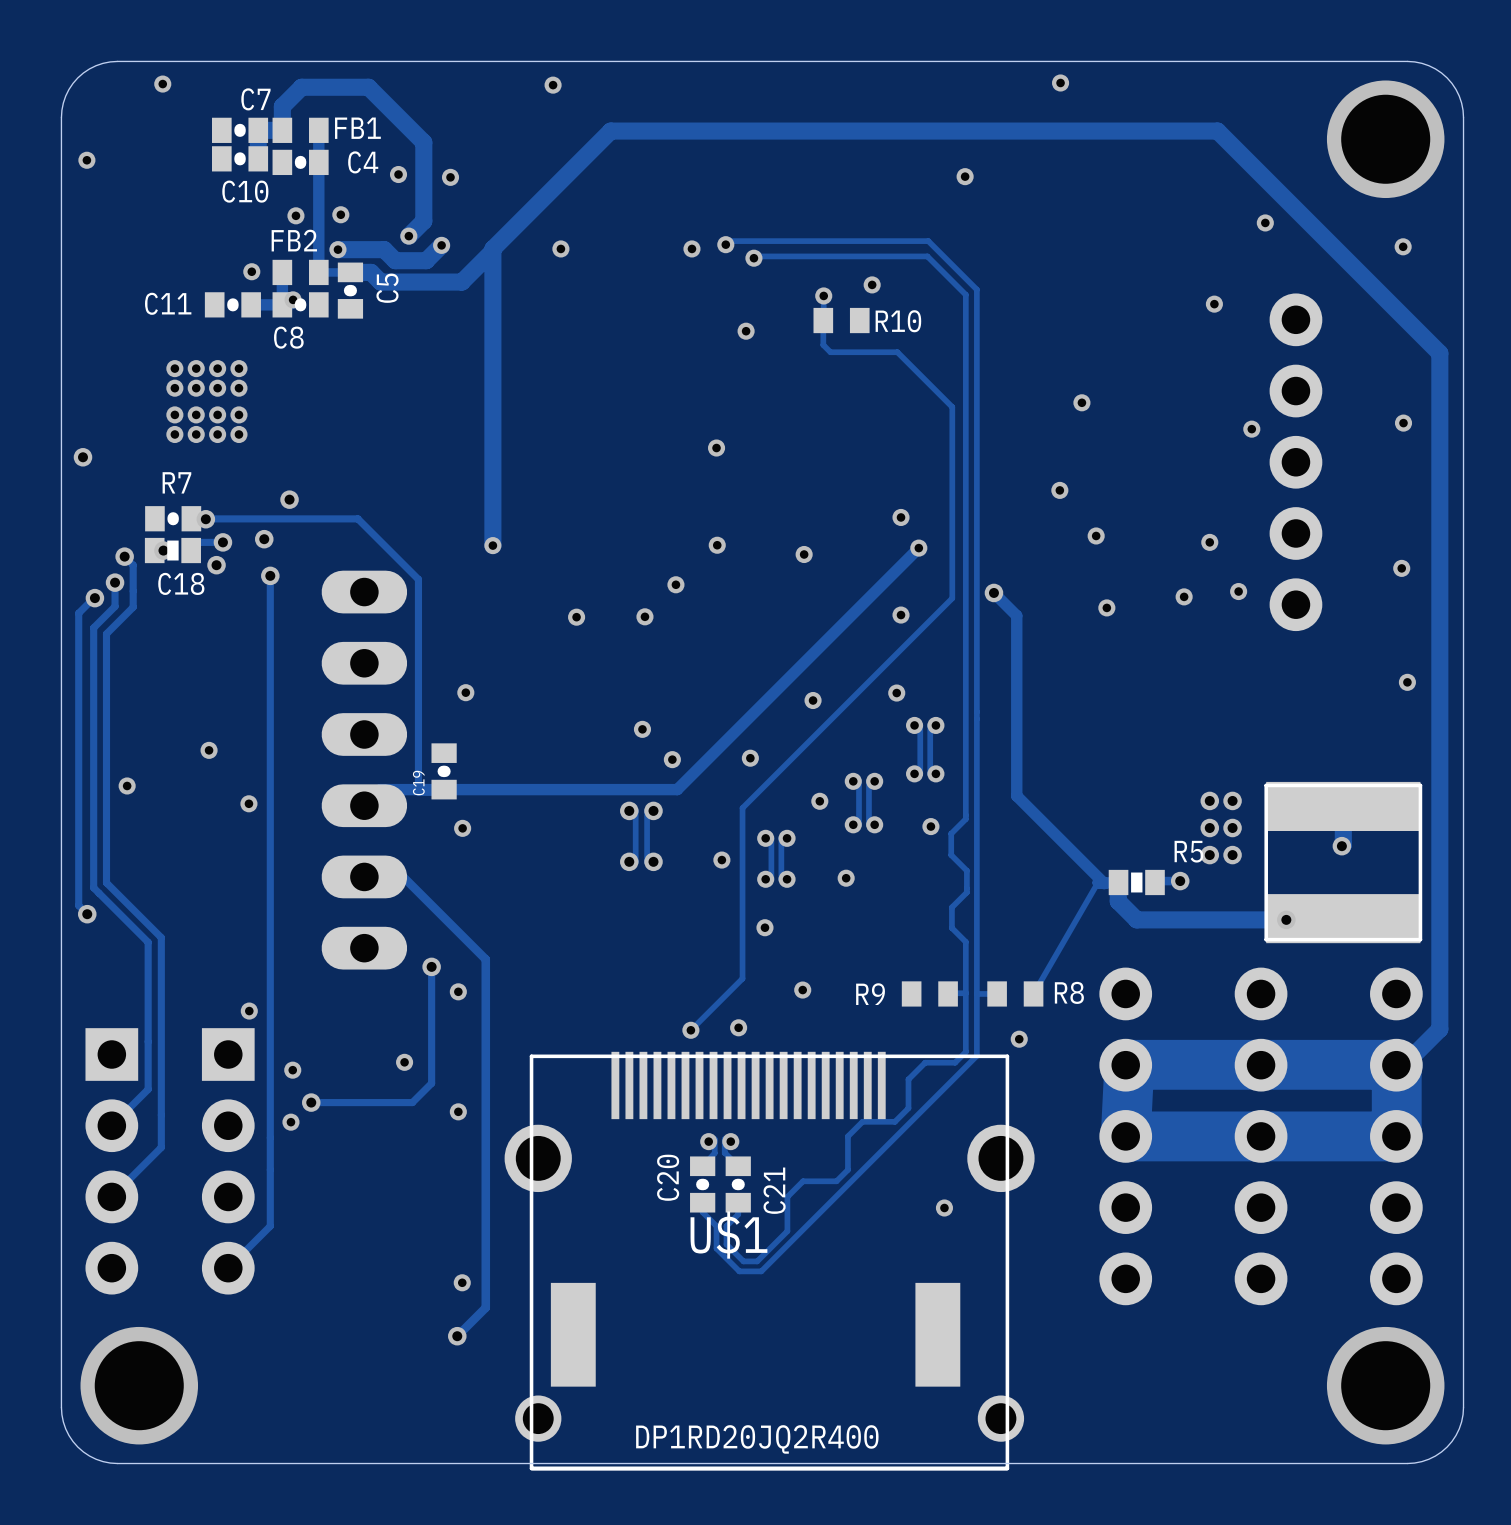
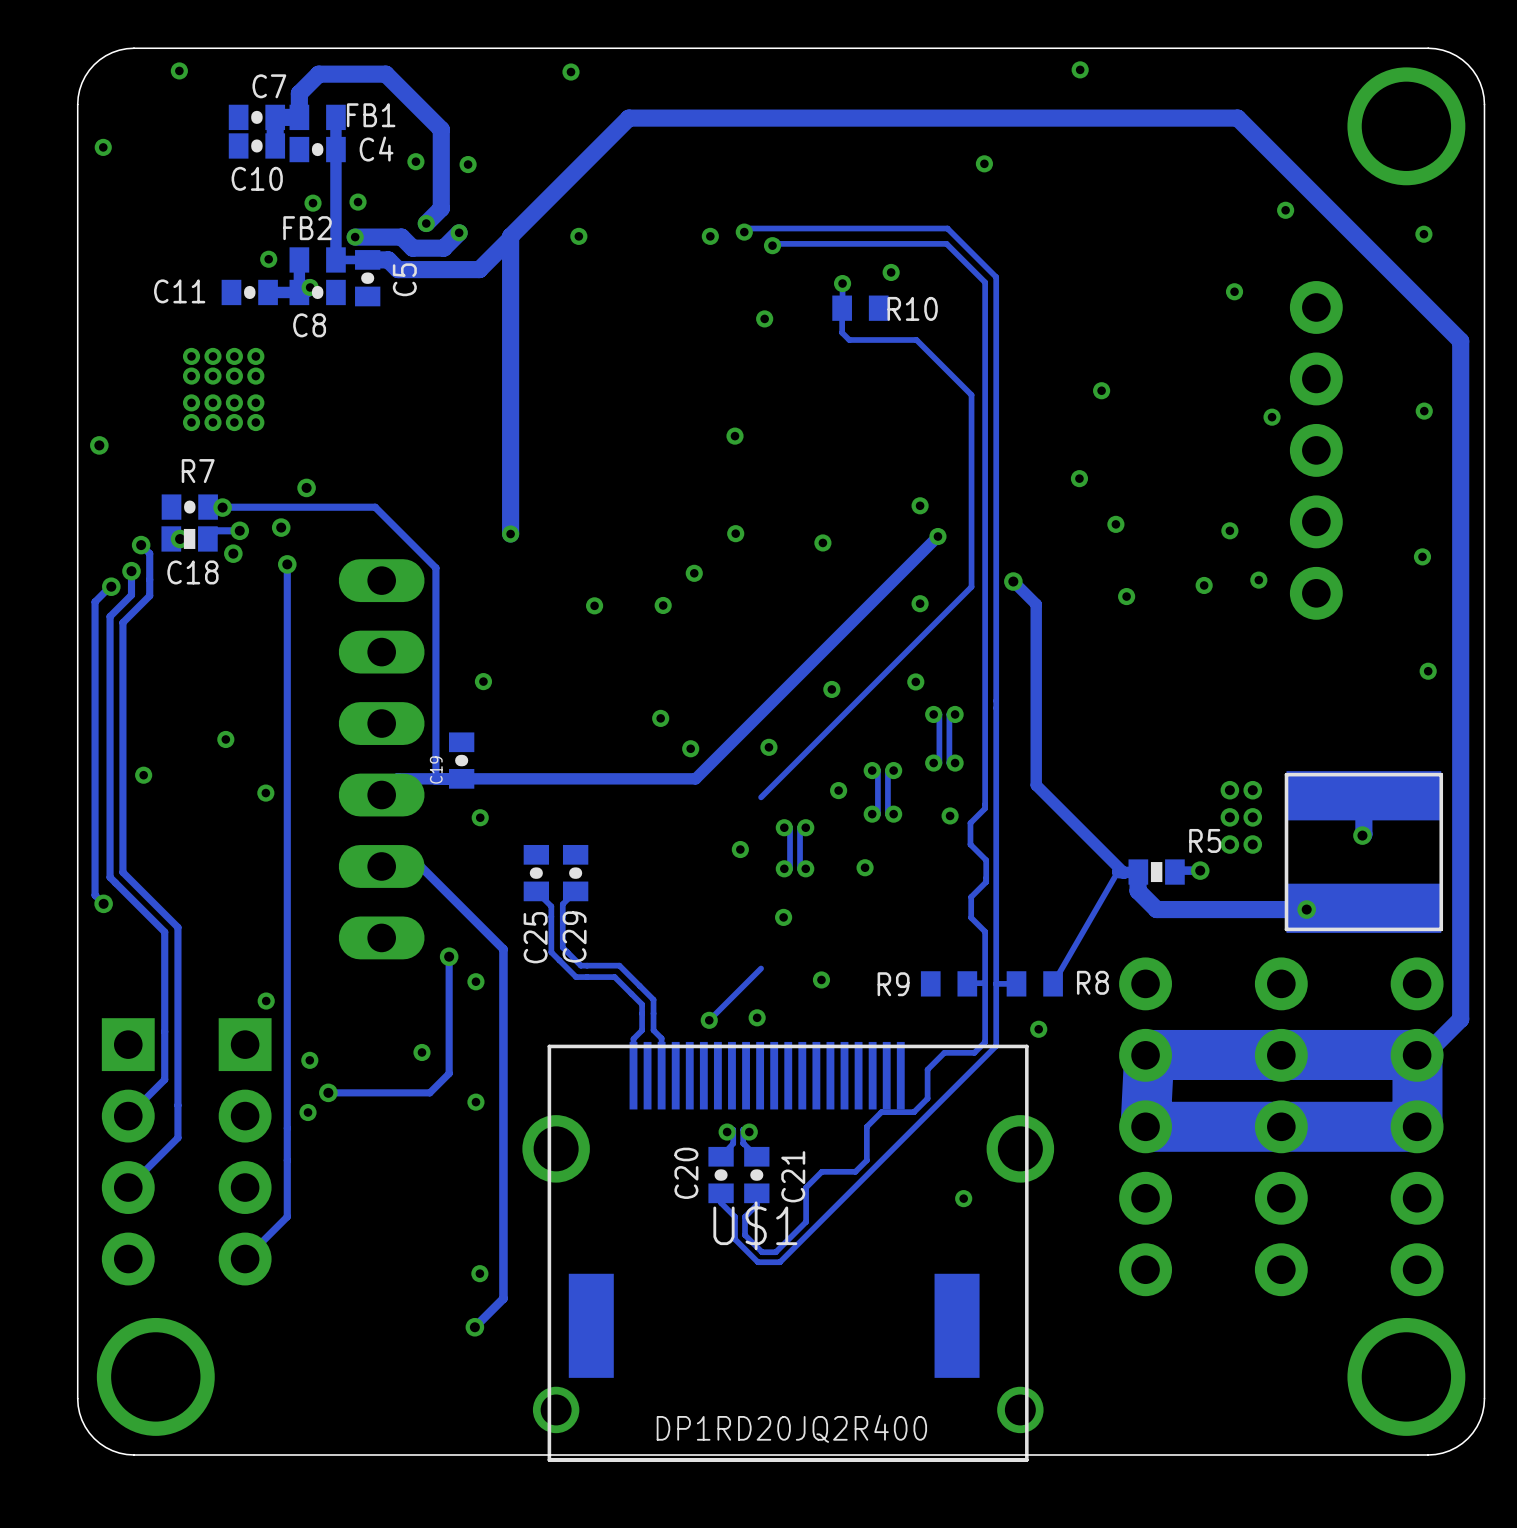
track: (742, 808) (742, 978) -> none
track: (629, 810) (635, 810) (635, 861) (629, 861) -> none
via: (629, 810) -> none
track: (653, 810) (647, 810) (647, 861) (653, 861) -> none
via: (653, 810) -> none
via: (629, 861) -> none
via: (653, 861) -> none
C25: none -> (536, 873)
C29: none -> (575, 873)
track: none -> (536, 891) (551, 906) (551, 952) (576, 977) (614, 977) (642, 1004) (642, 1030) (633, 1038) (633, 1075)
track: none -> (575, 891) (562, 904) (562, 947) (580, 965) (619, 965) (653, 999) (653, 1030) (661, 1038) (661, 1075)

